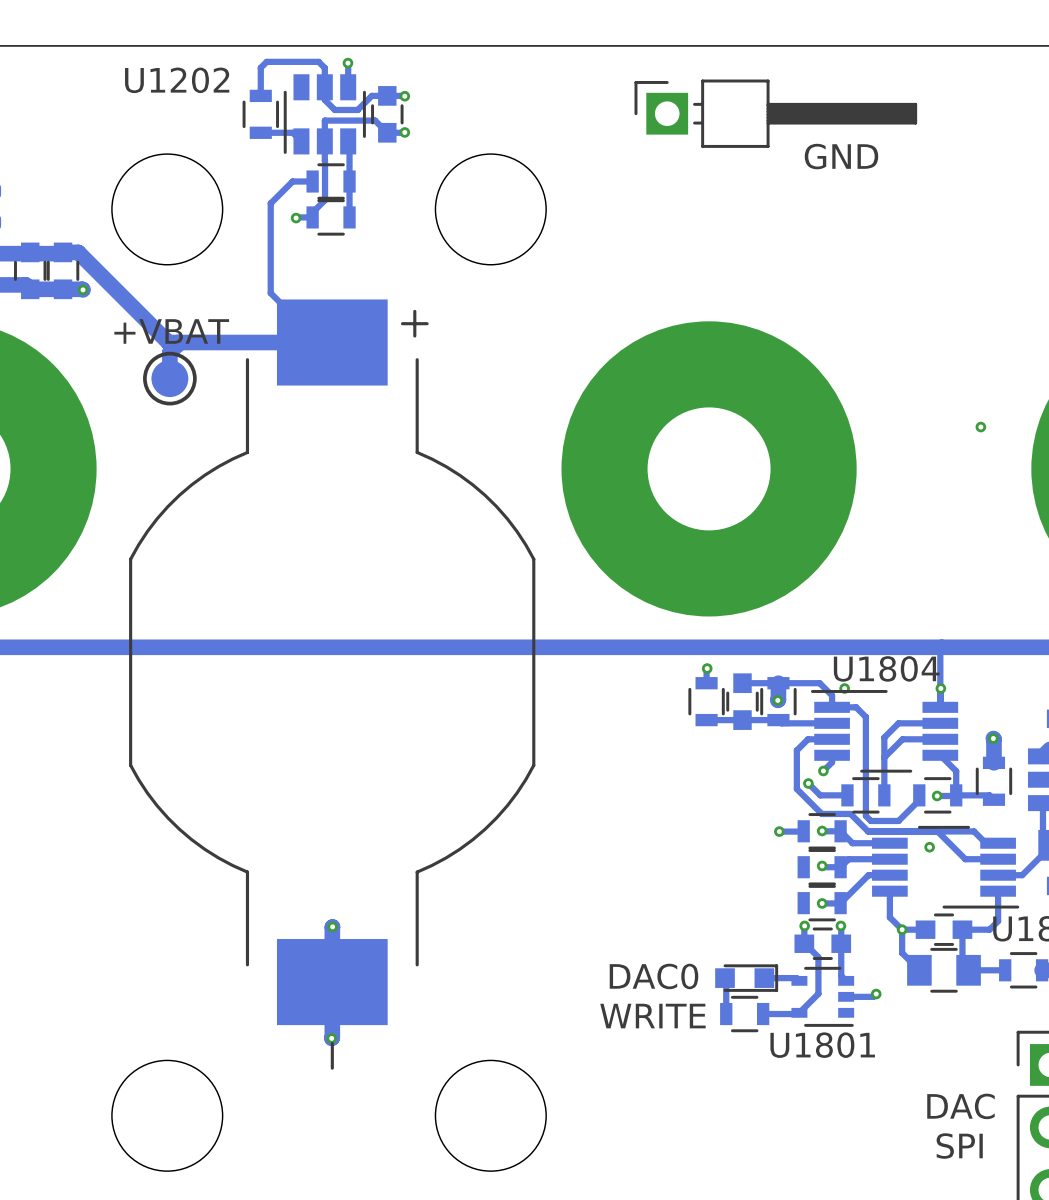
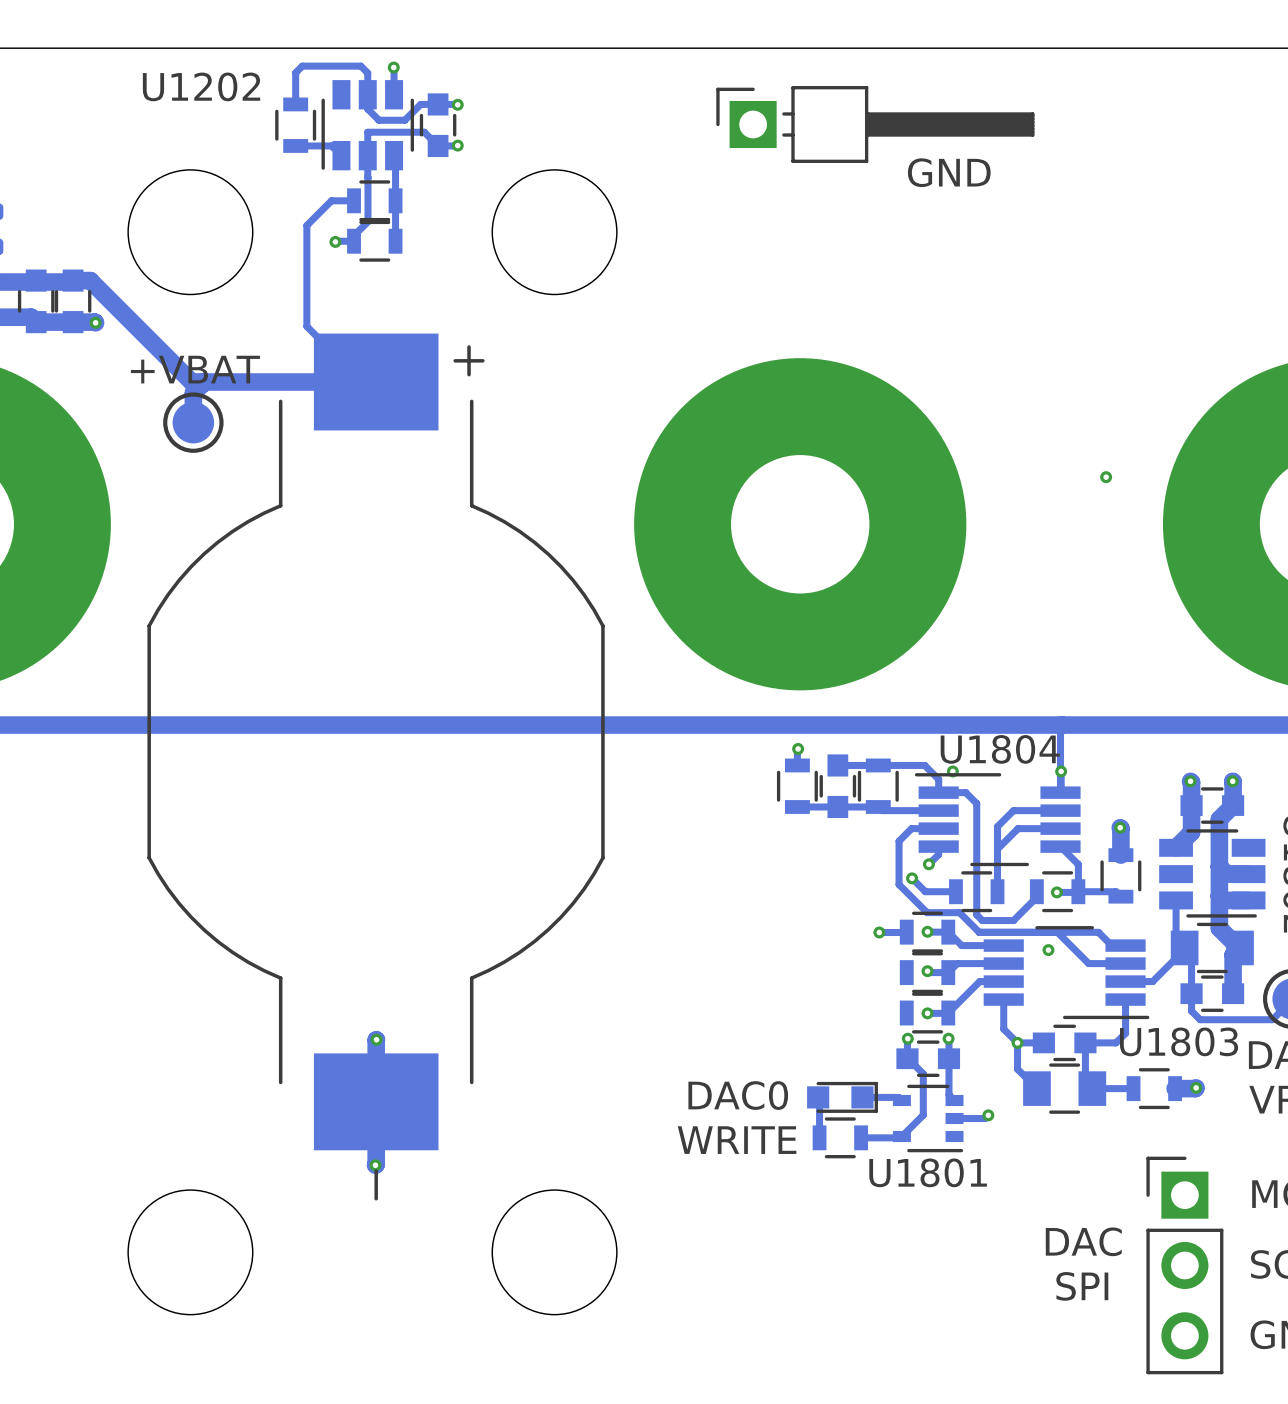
track: (778, 683) (777, 700) -> none
via: (777, 700) -> none

